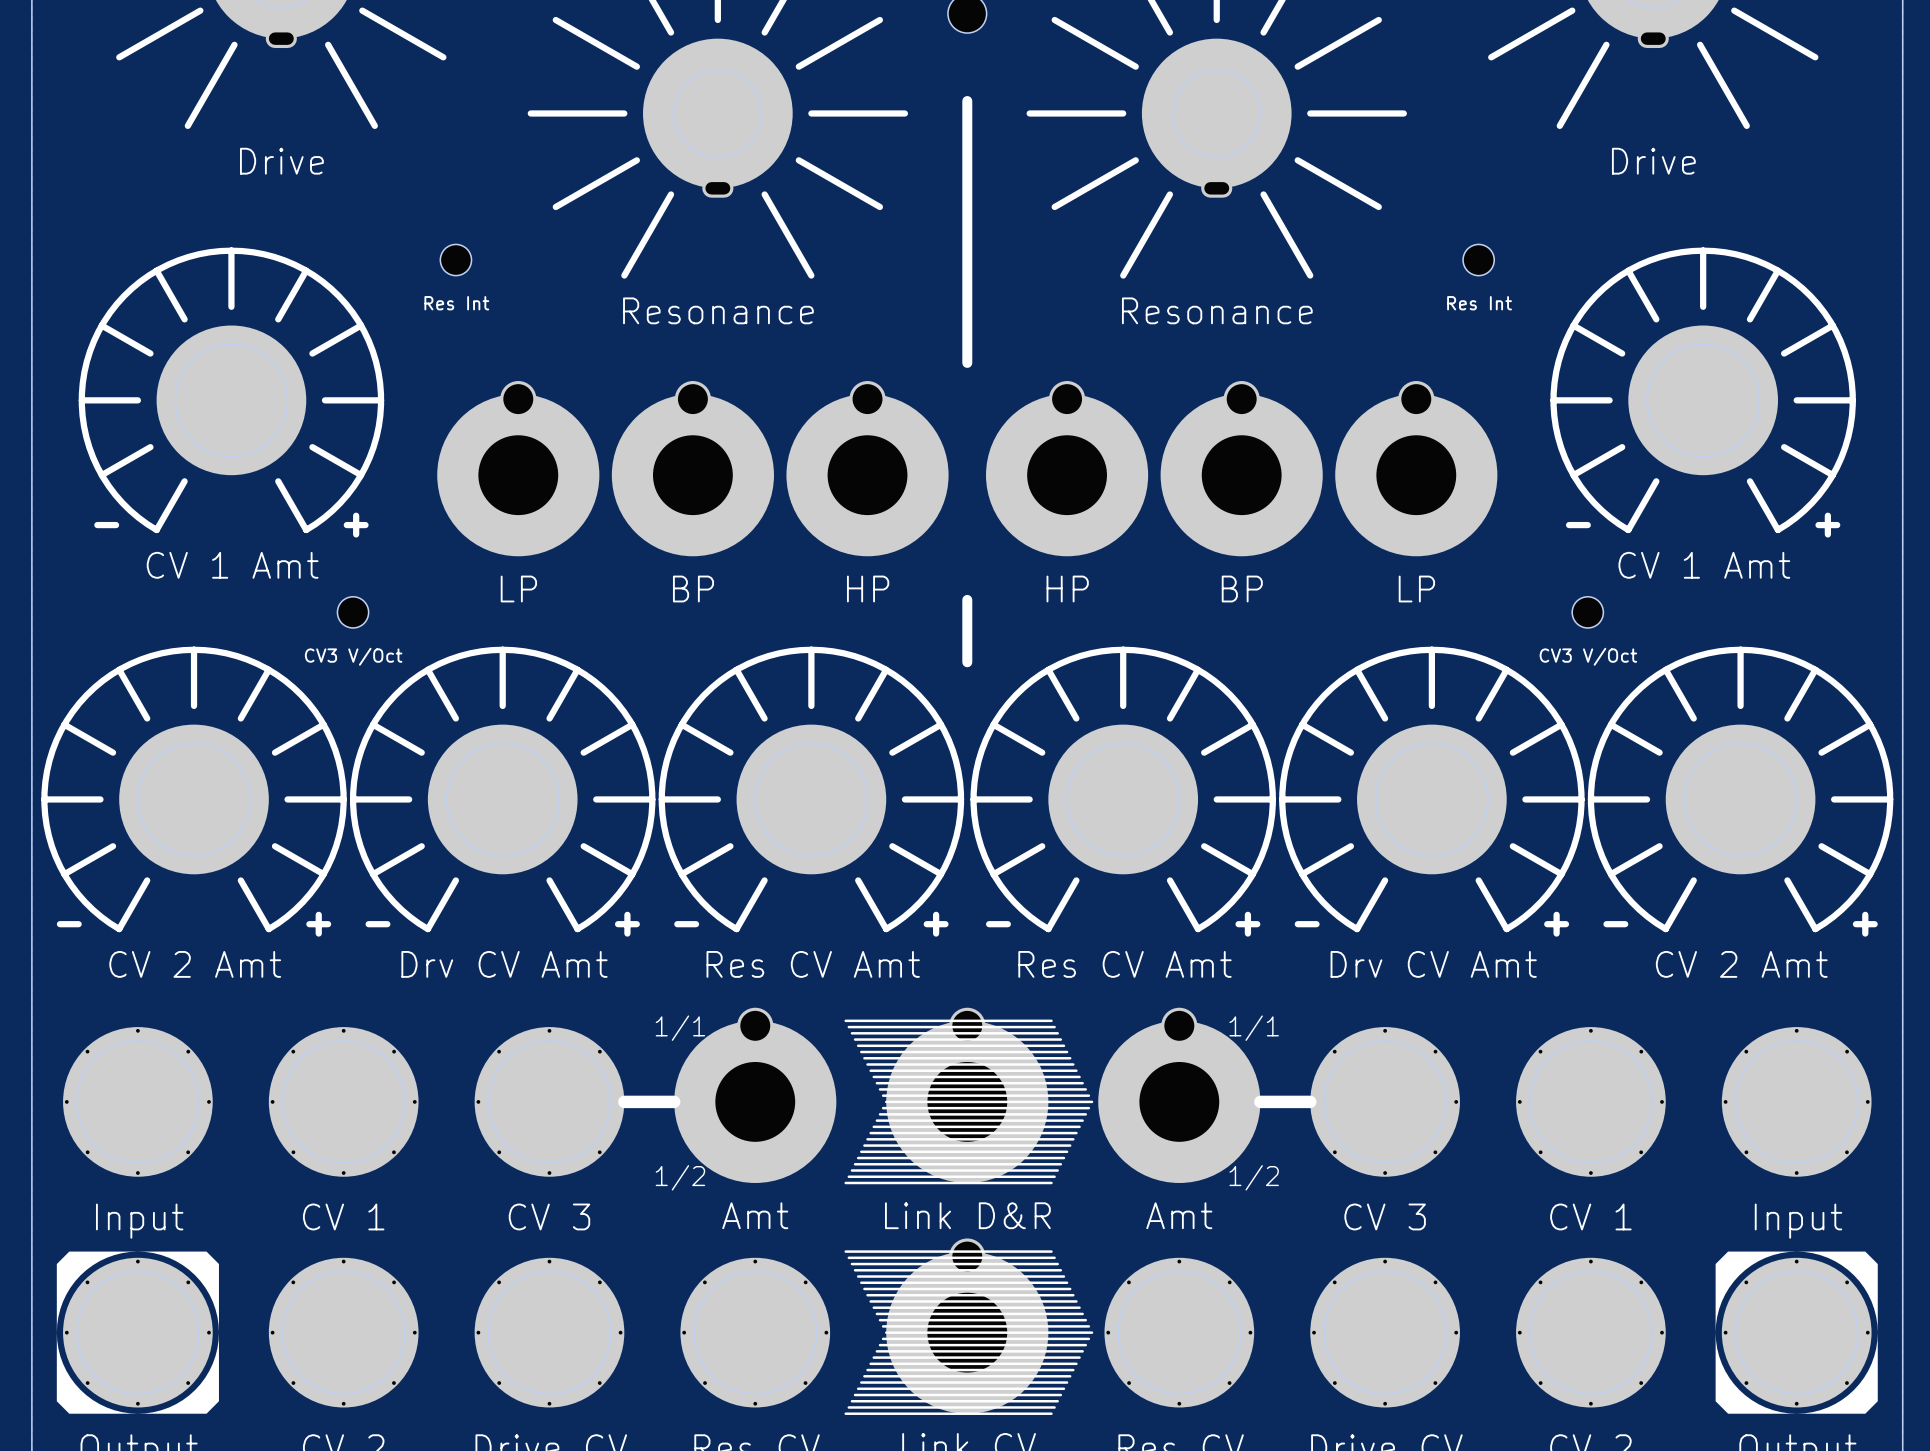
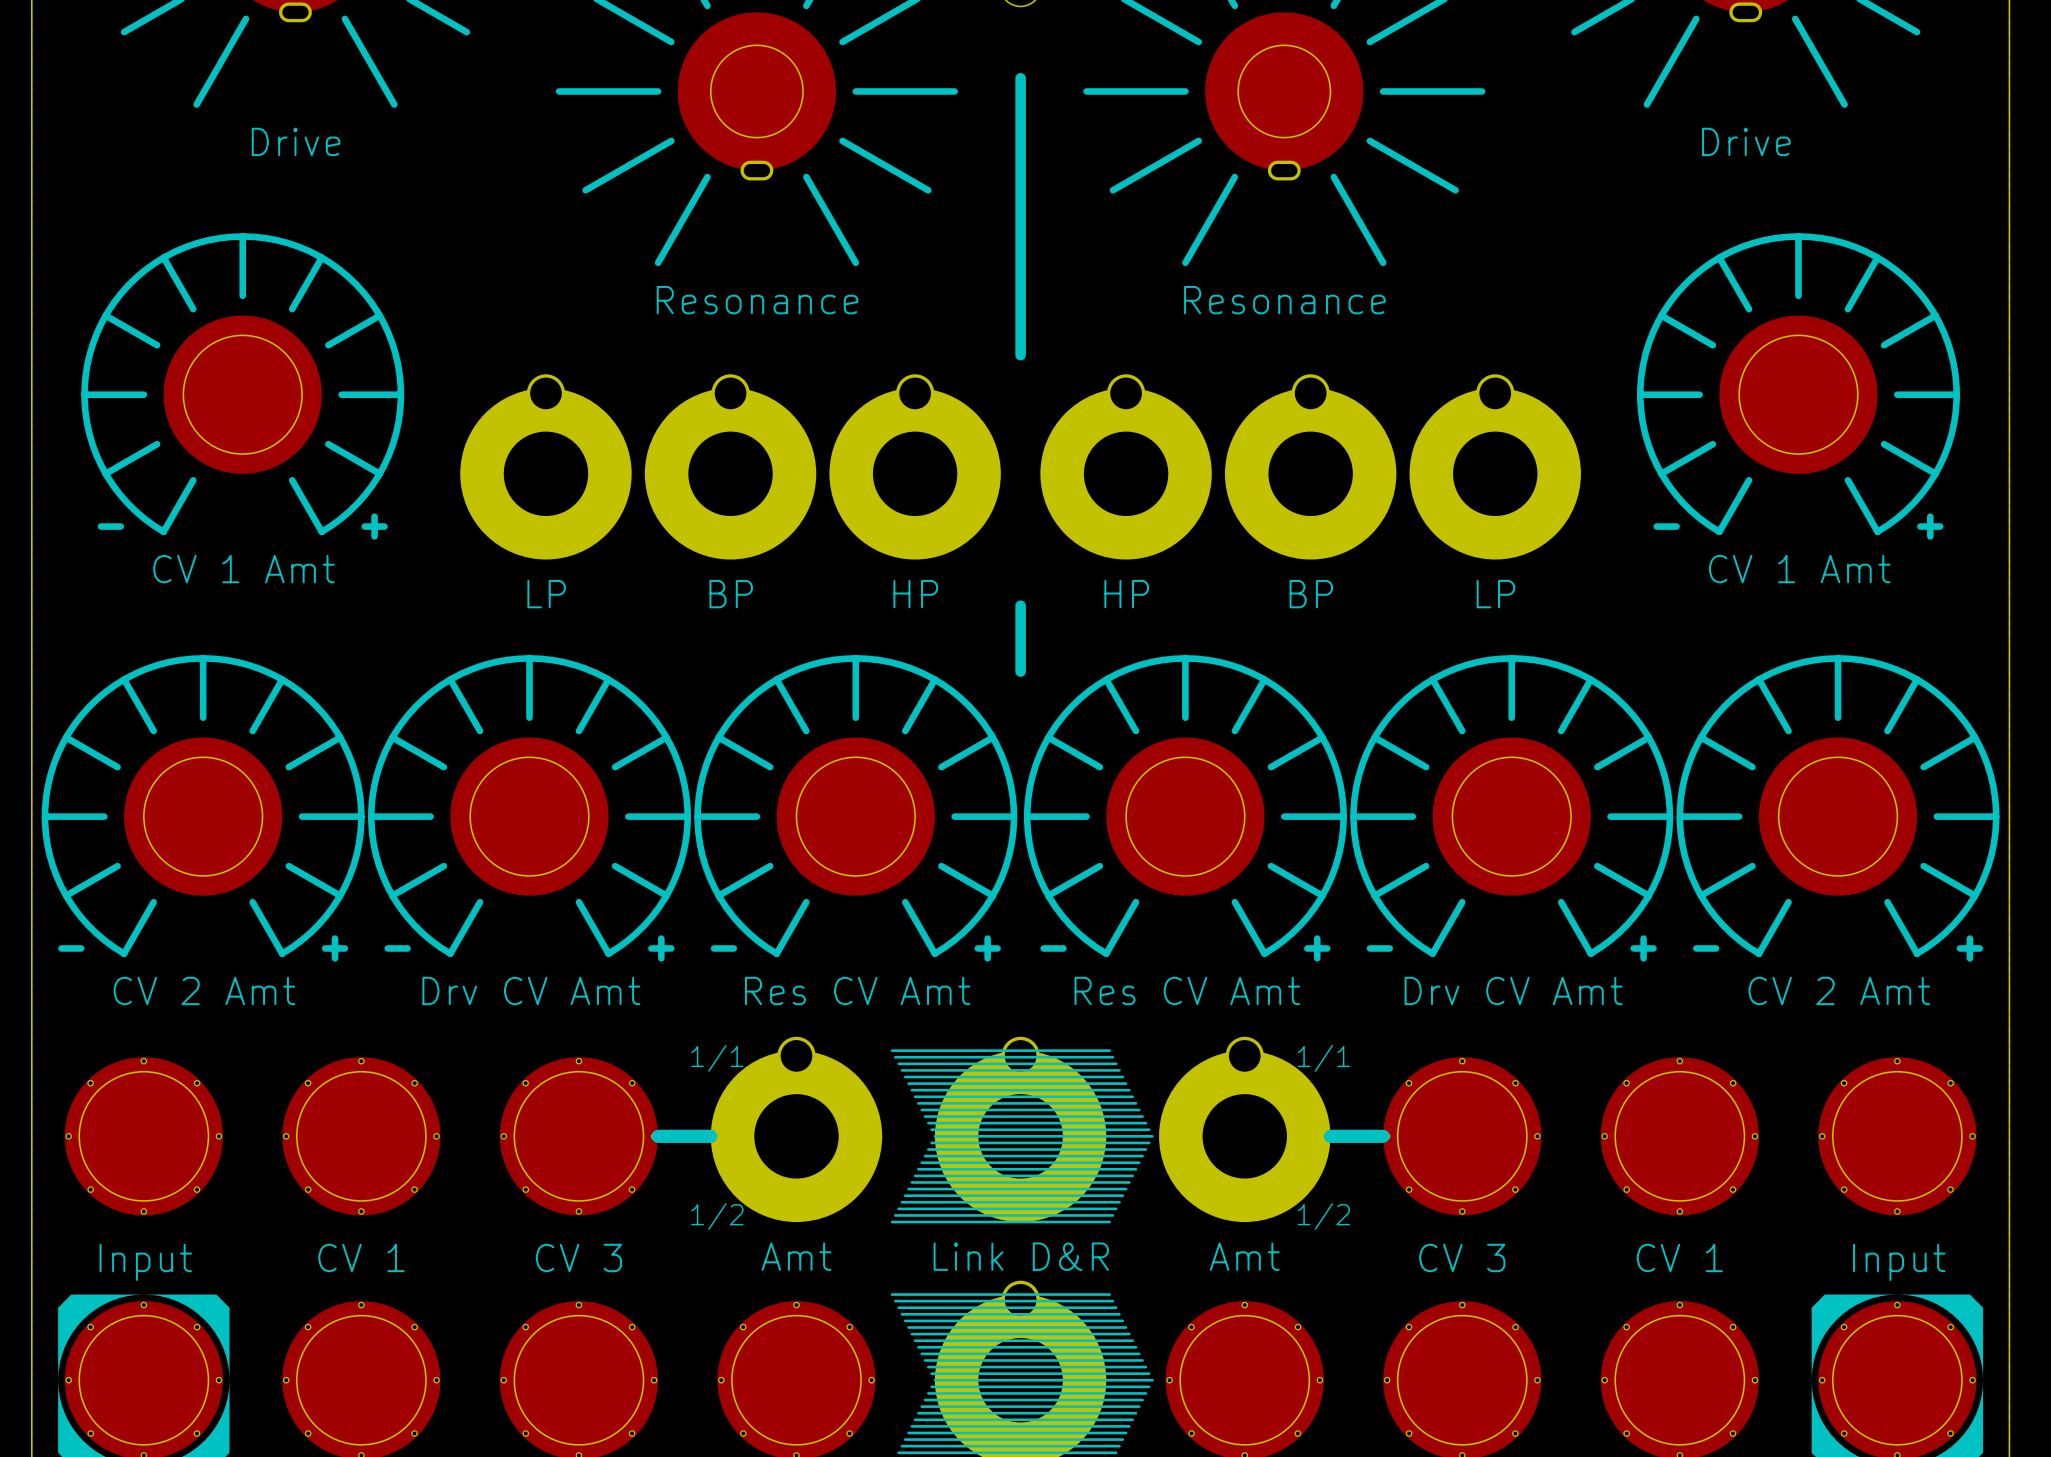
part: Res Int (455, 260) -> none
part: Res Int (1478, 260) -> none
part: CV3 V/Oct (353, 612) -> none
part: CV3 V/Oct (1587, 612) -> none

